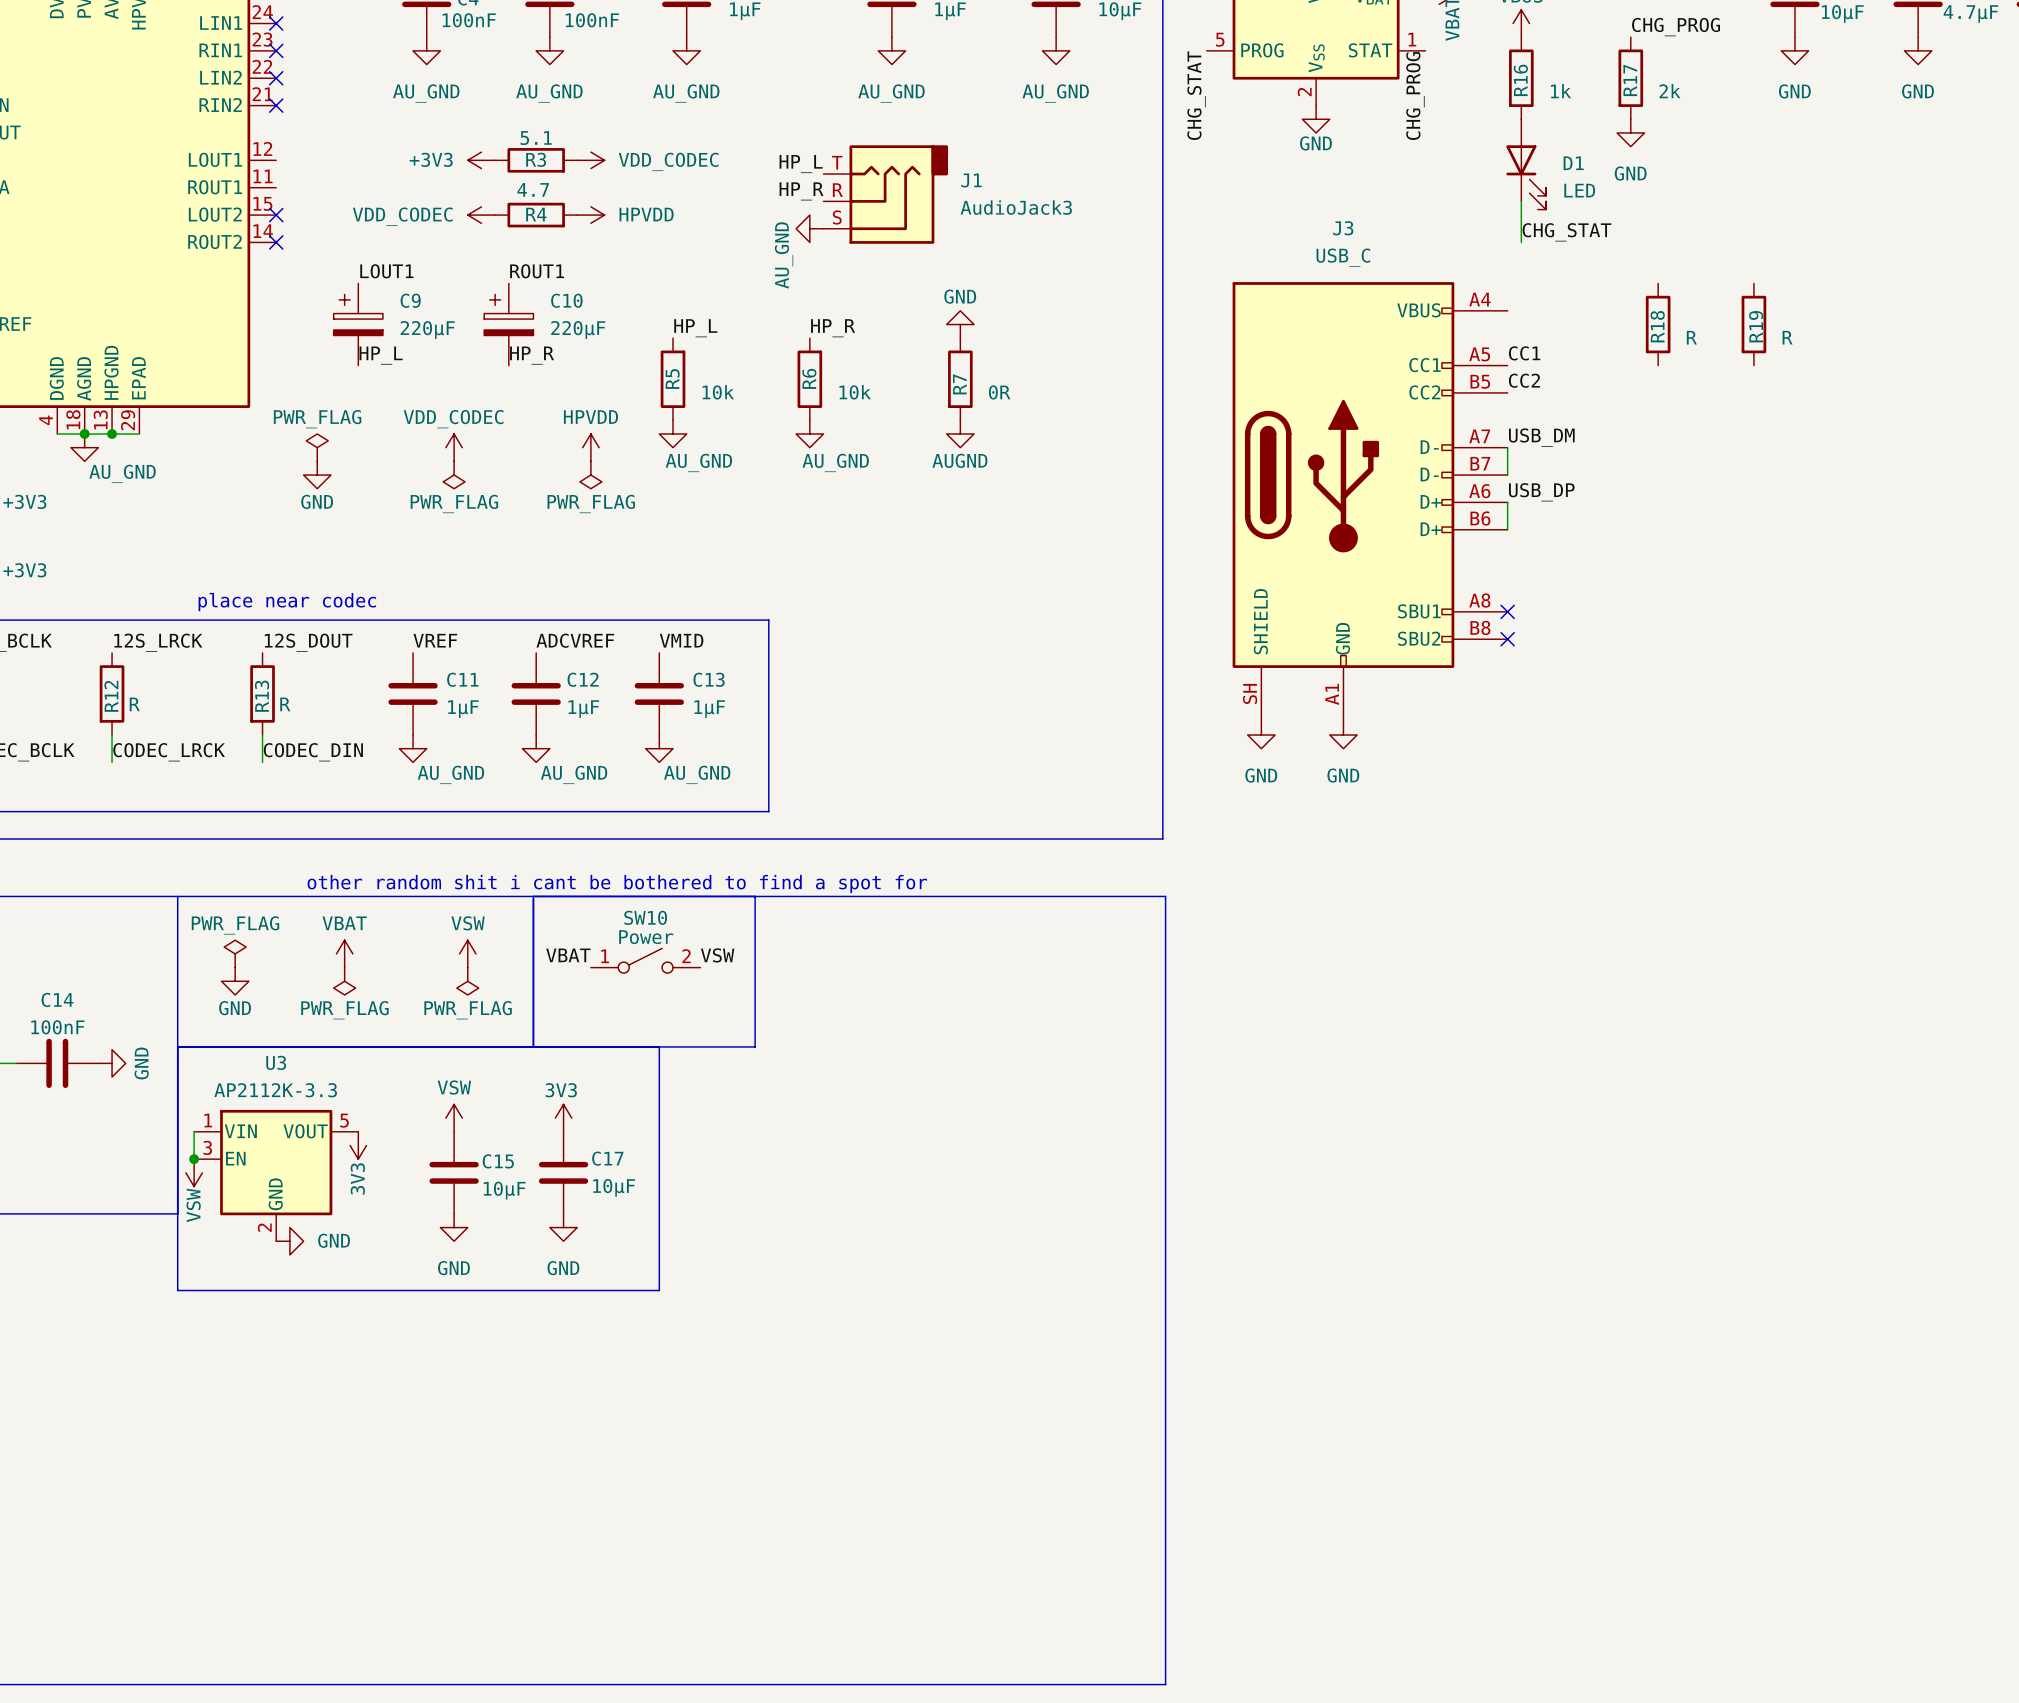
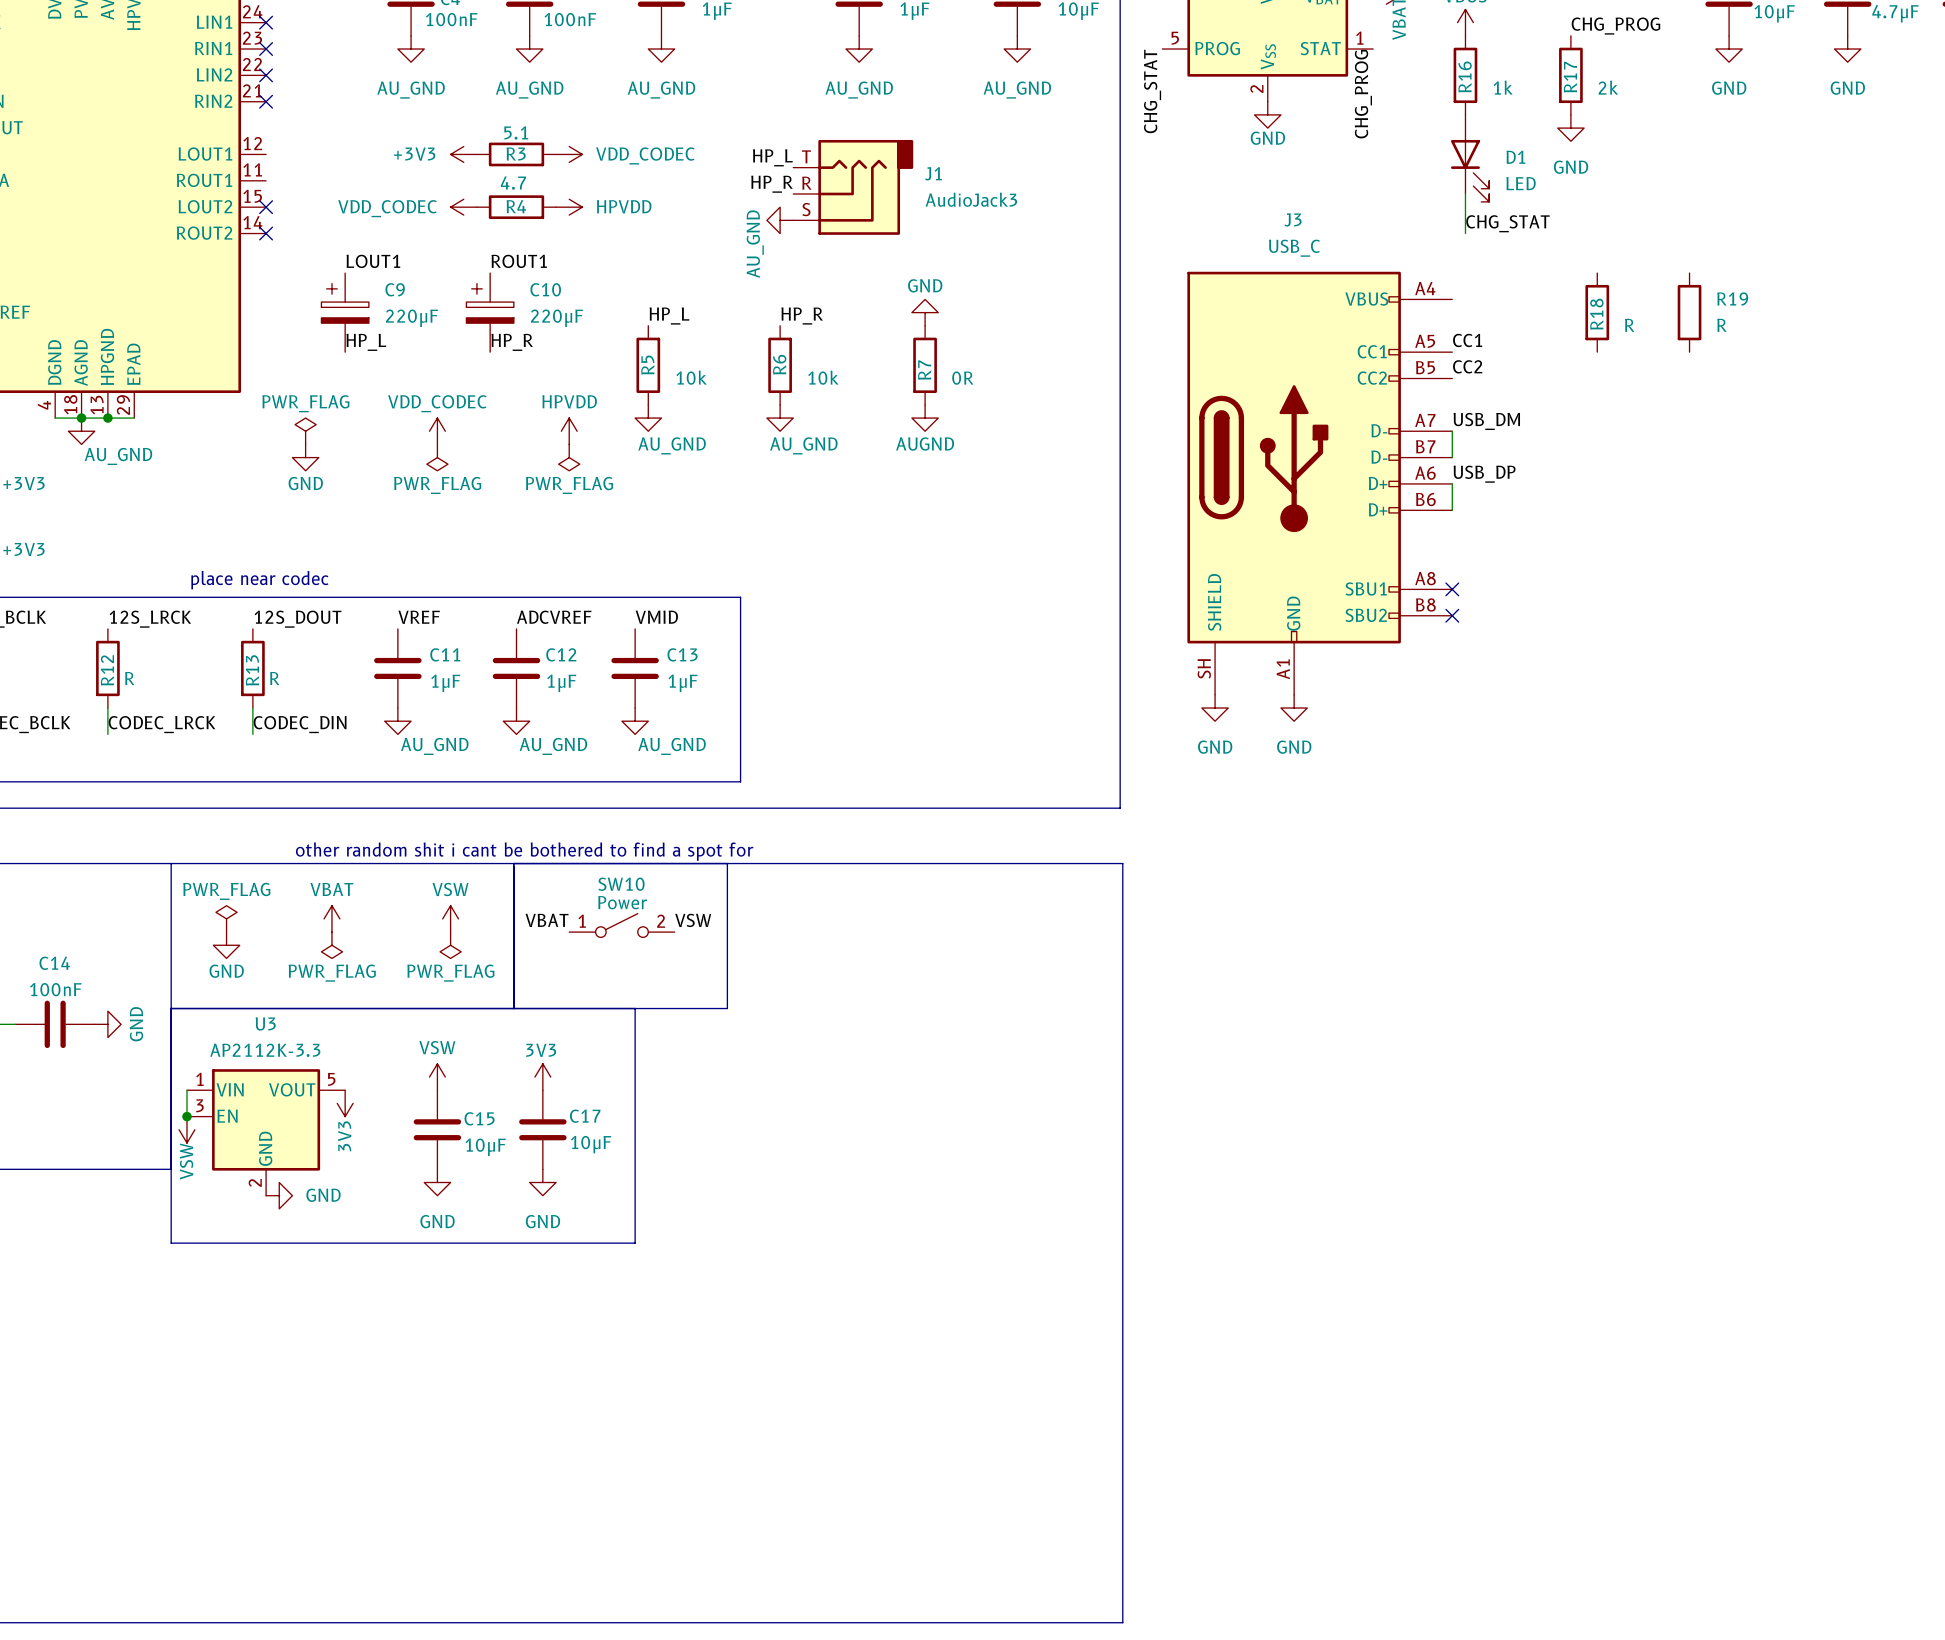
R19 name rotation: 0° (1756, 326) -> 90° clockwise (1732, 299)
R19 name position: R19 (1756, 326) -> R19 (1732, 299)

